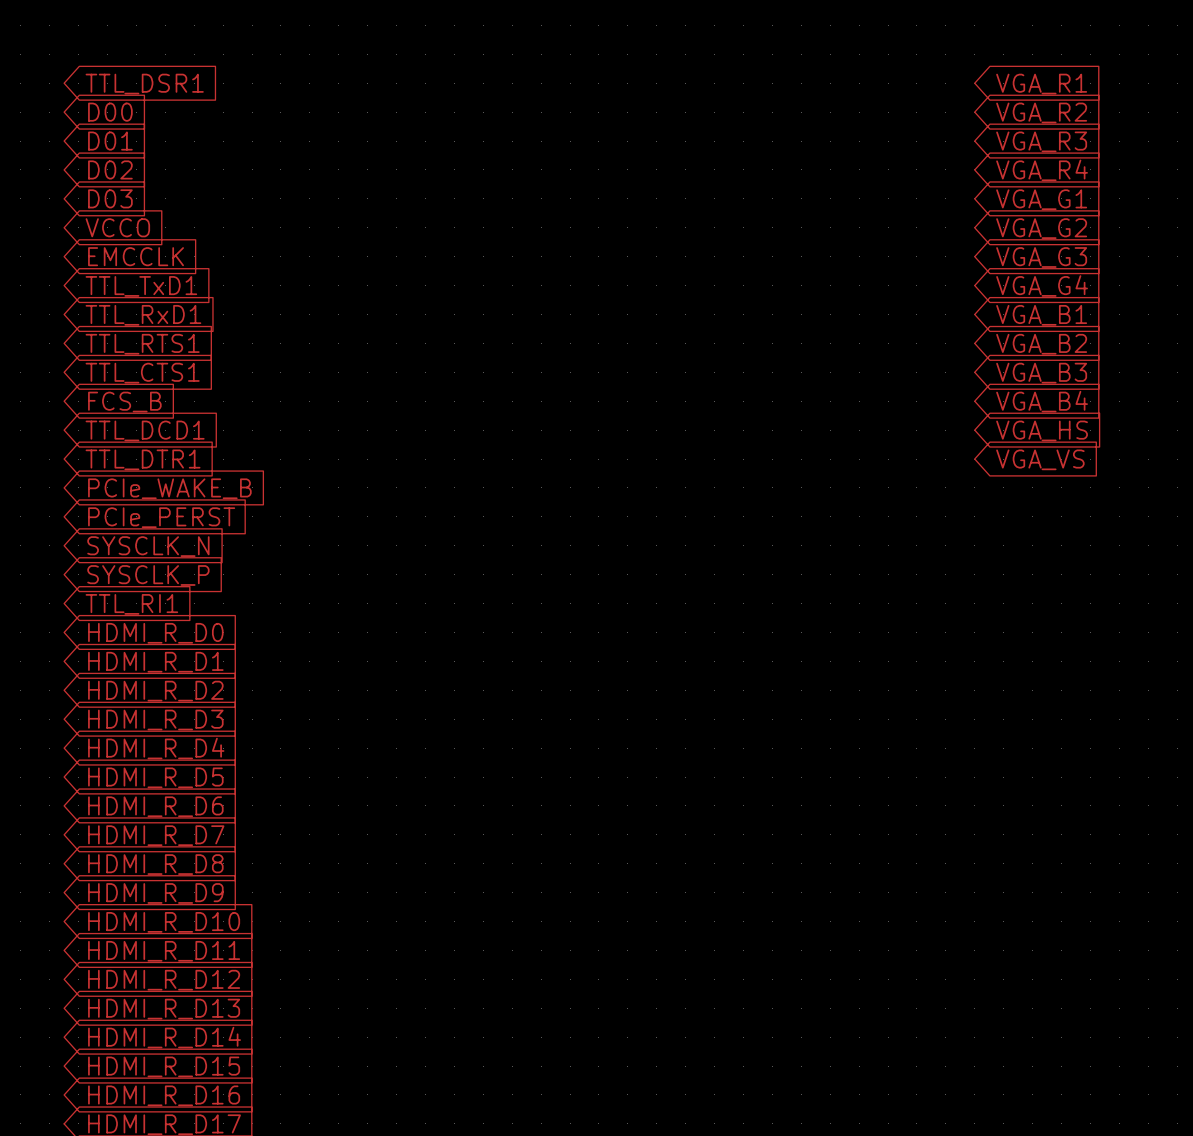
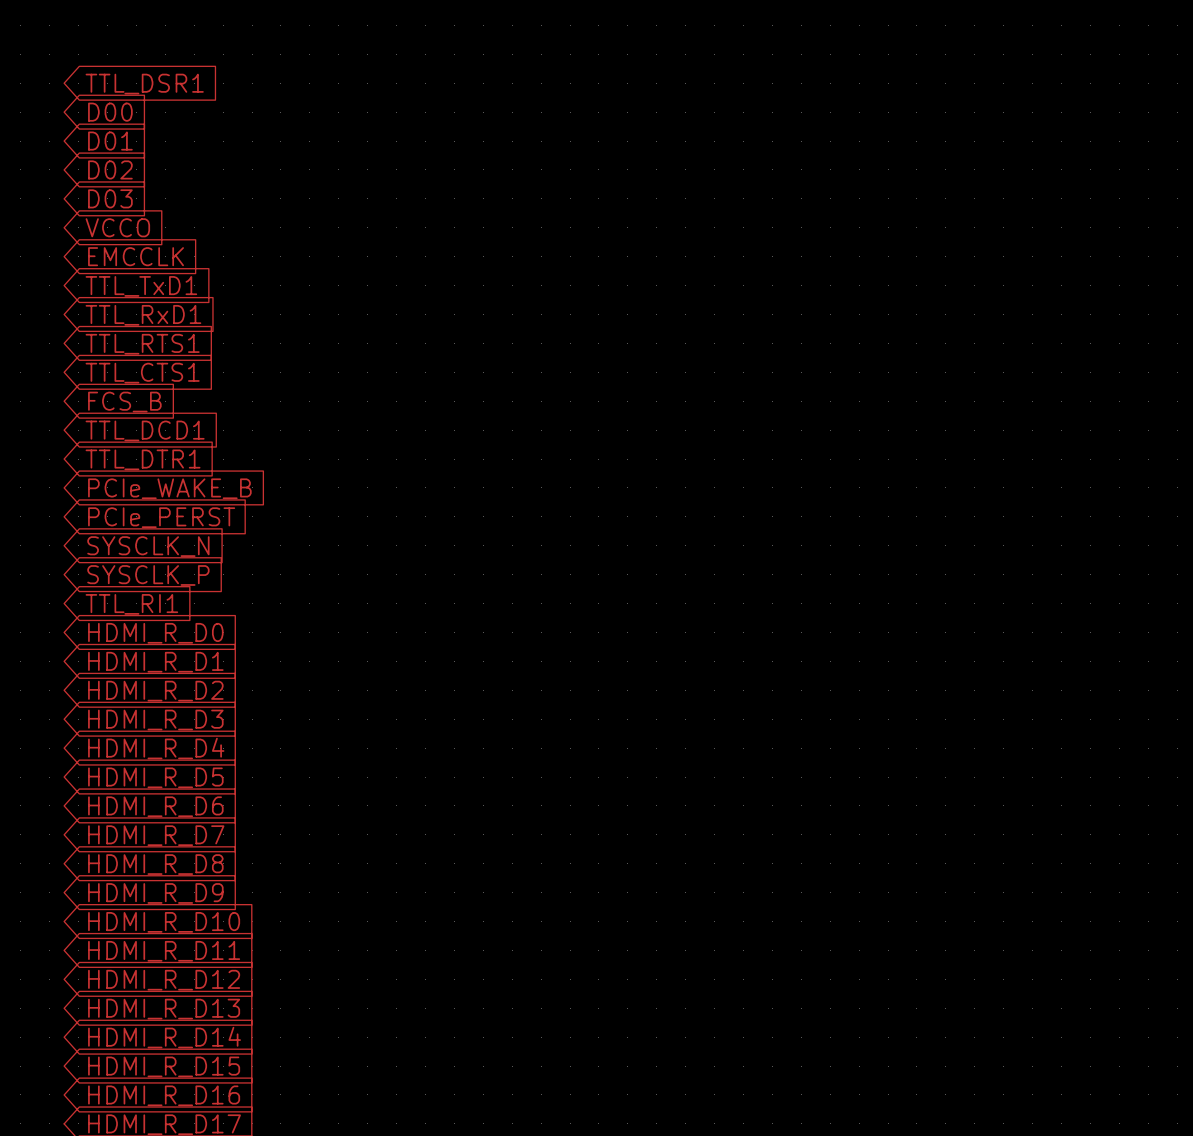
global label: VGA_R1 (1041, 84) -> none
global label: VGA_R2 (1041, 112) -> none
global label: VGA_R3 (1041, 141) -> none
global label: VGA_R4 (1042, 170) -> none
global label: VGA_G1 (1041, 199) -> none
global label: VGA_G2 (1041, 228) -> none
global label: VGA_G3 (1041, 257) -> none
global label: VGA_G4 (1042, 285) -> none
global label: VGA_B1 (1041, 315) -> none
global label: VGA_B2 (1041, 344) -> none
global label: VGA_B3 (1041, 373) -> none
global label: VGA_B4 (1042, 401) -> none
global label: VGA_HS (1042, 430) -> none
global label: VGA_VS (1040, 459) -> none

